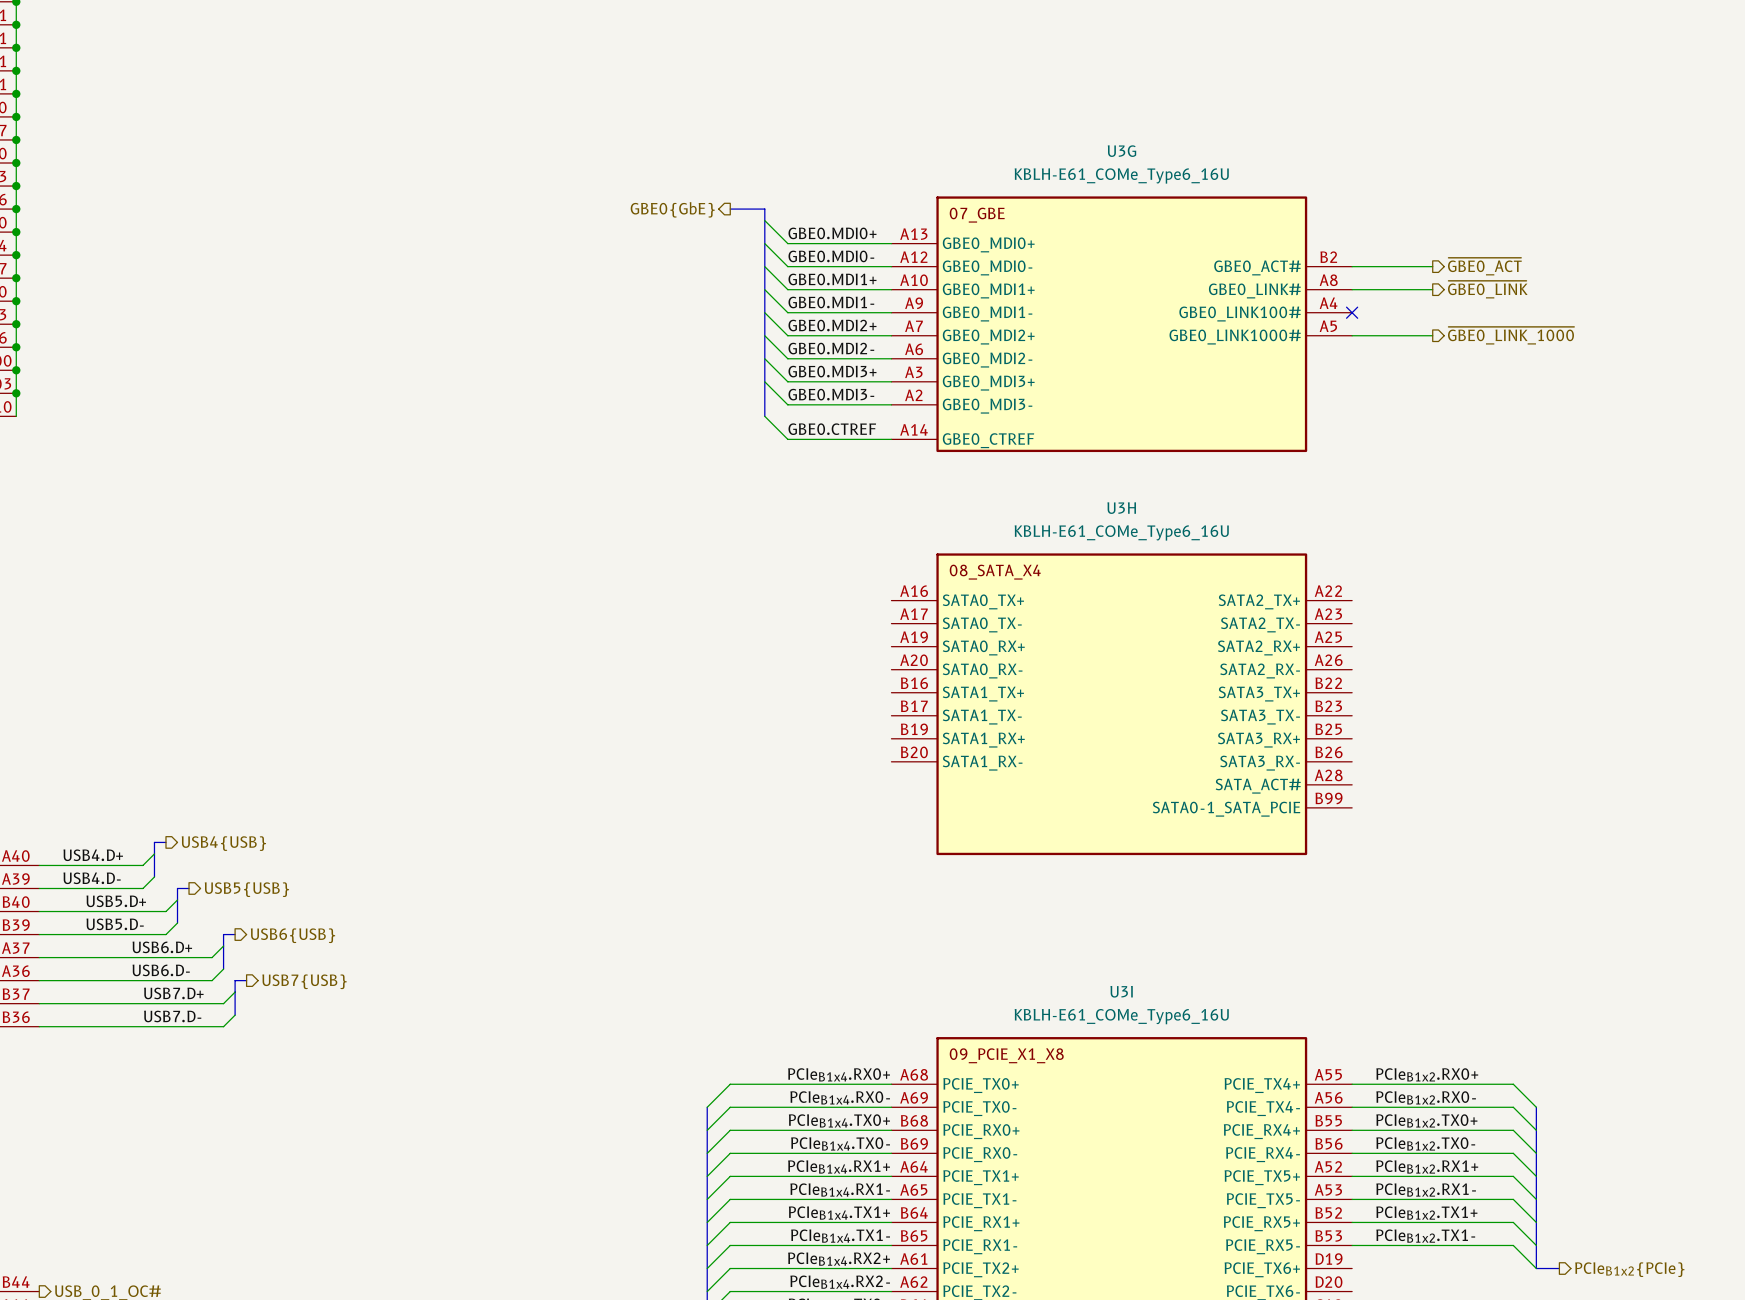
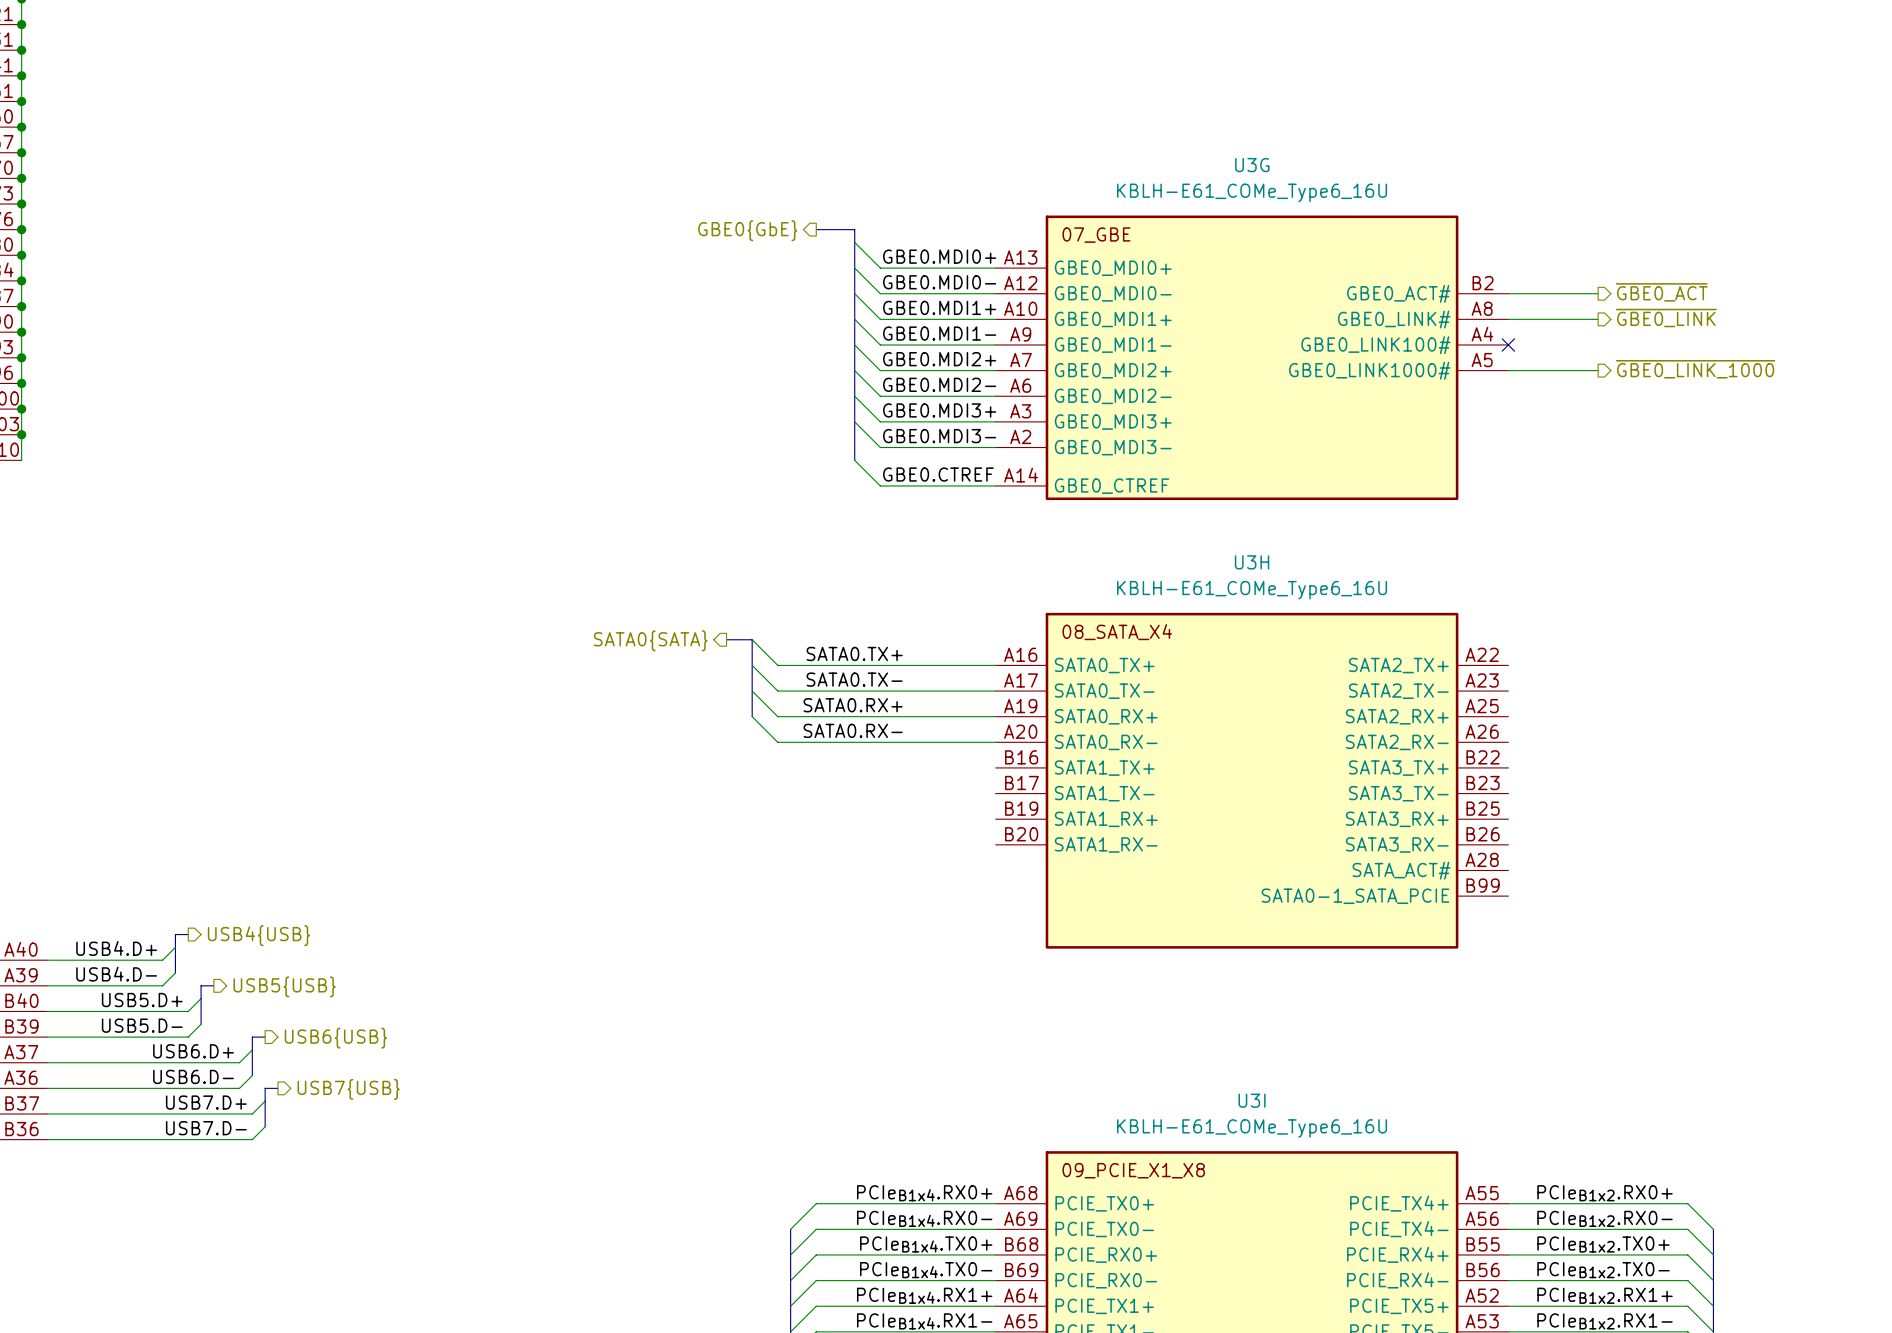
bus: none -> (726, 639) (752, 639) (752, 716)
wire: none -> (752, 639) (777, 665) (995, 665)
hierarchical label: none -> SATA0{SATA} (650, 640)
label: none -> SATA0.TX+ (854, 653)
wire: none -> (752, 665) (777, 691) (995, 691)
label: none -> SATA0.TX- (854, 679)
wire: none -> (752, 691) (777, 716) (995, 716)
label: none -> SATA0.RX+ (853, 705)
wire: none -> (752, 716) (777, 742) (995, 742)
label: none -> SATA0.RX- (853, 730)

